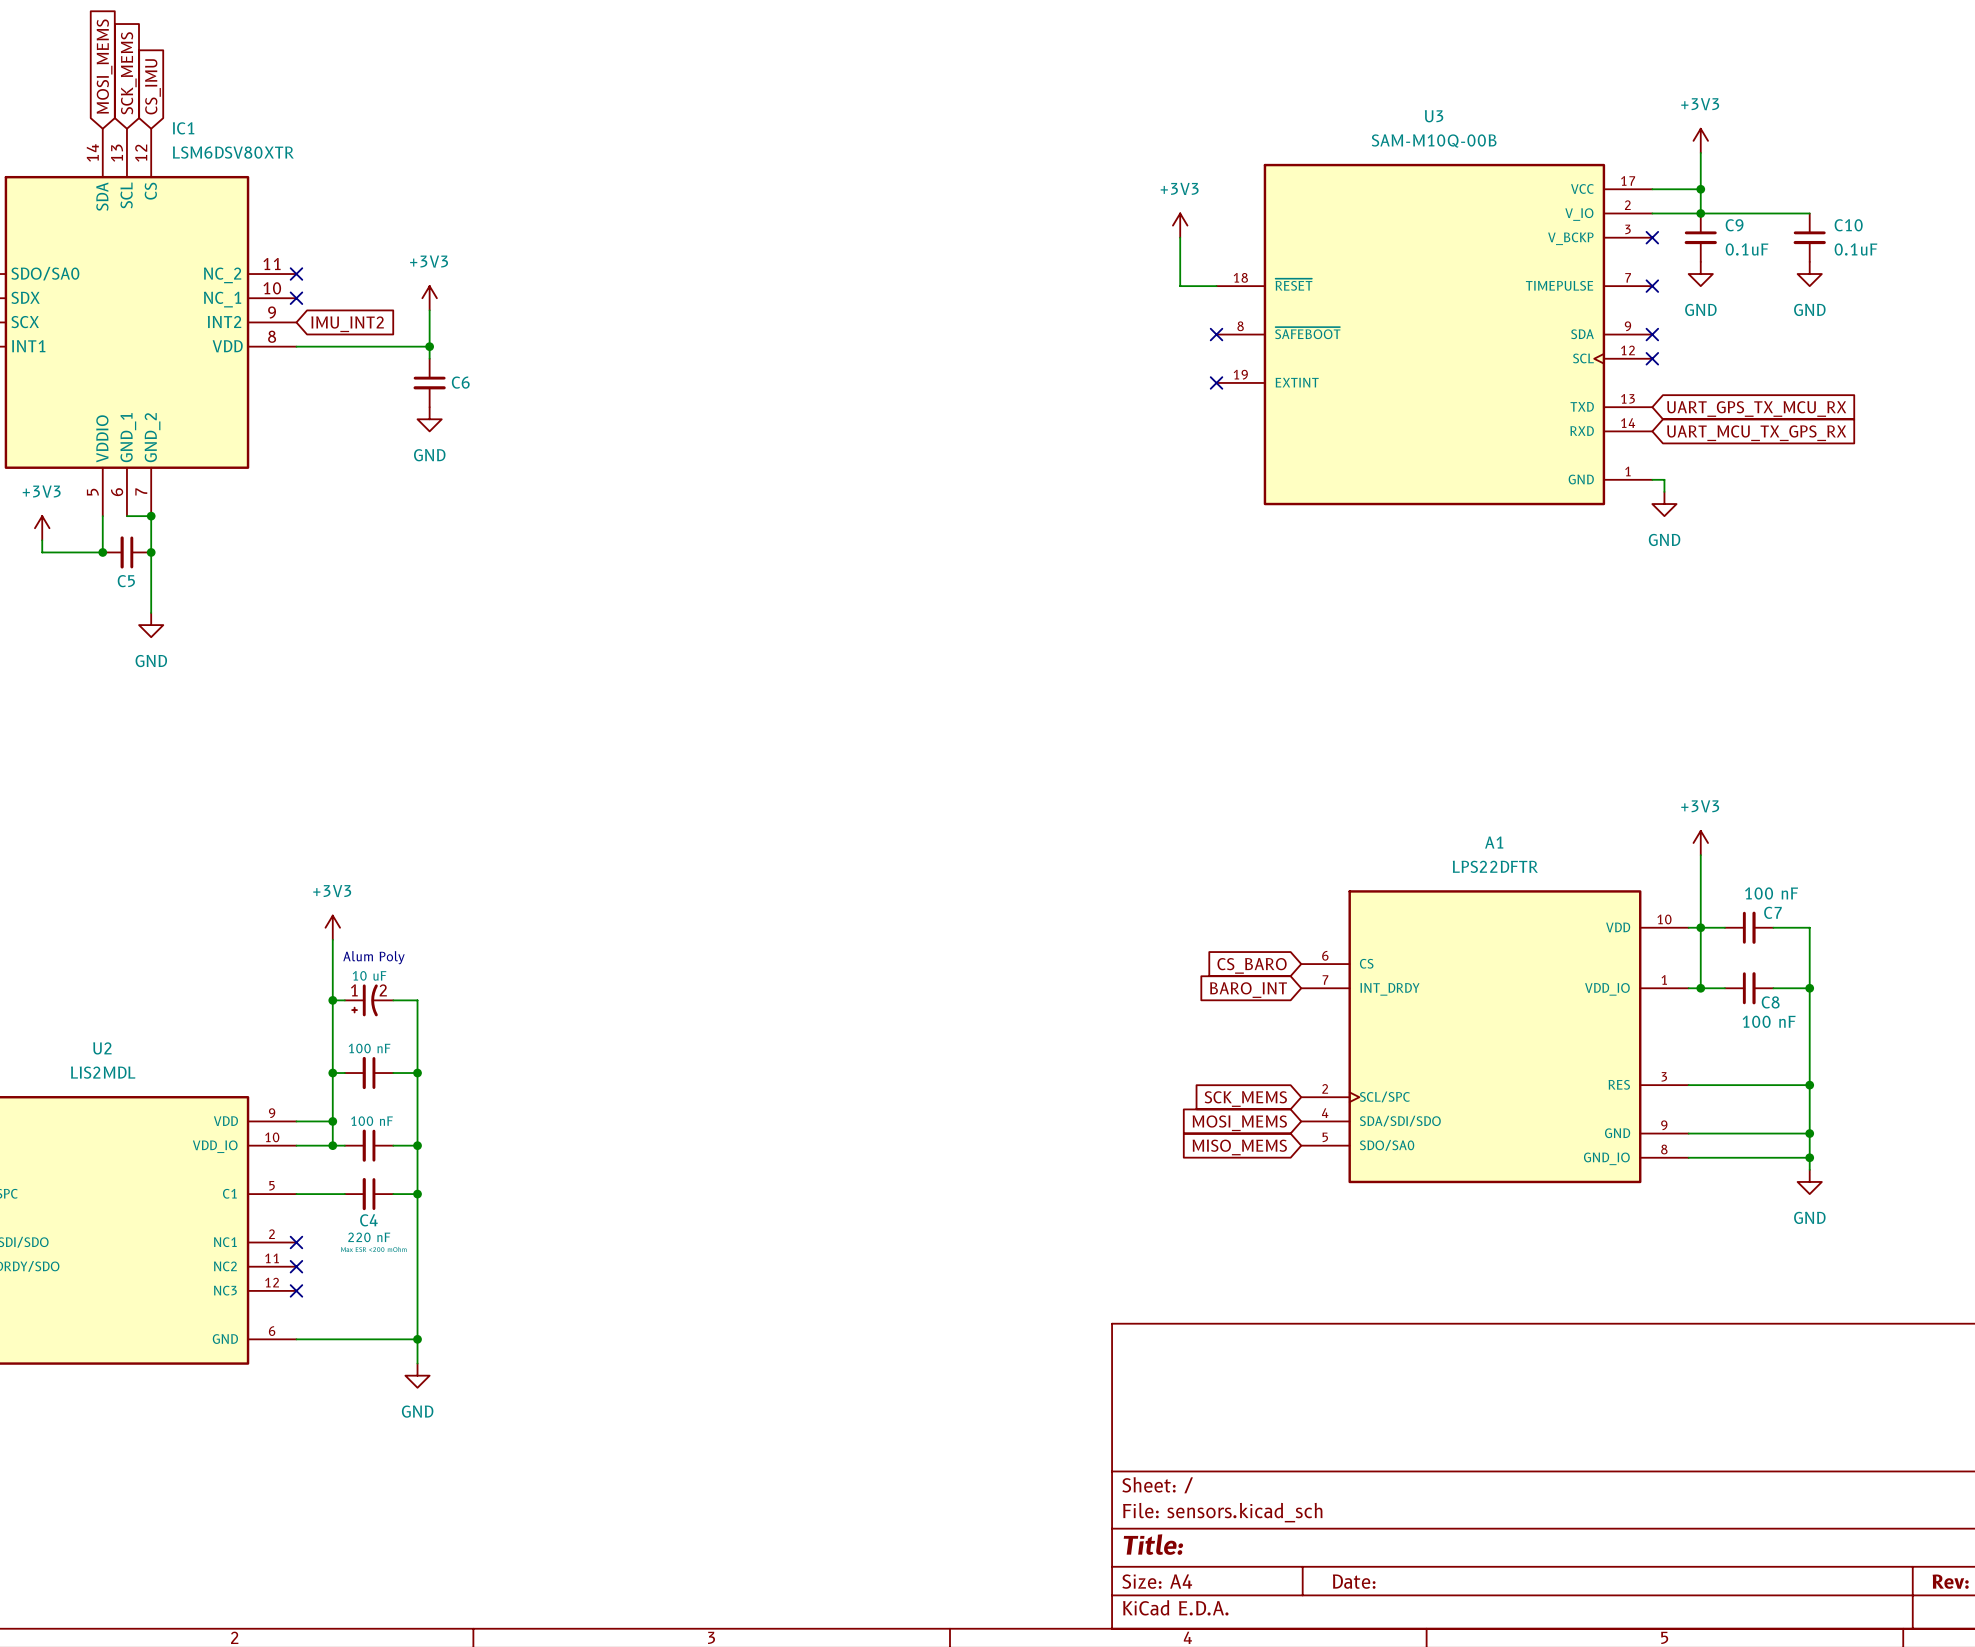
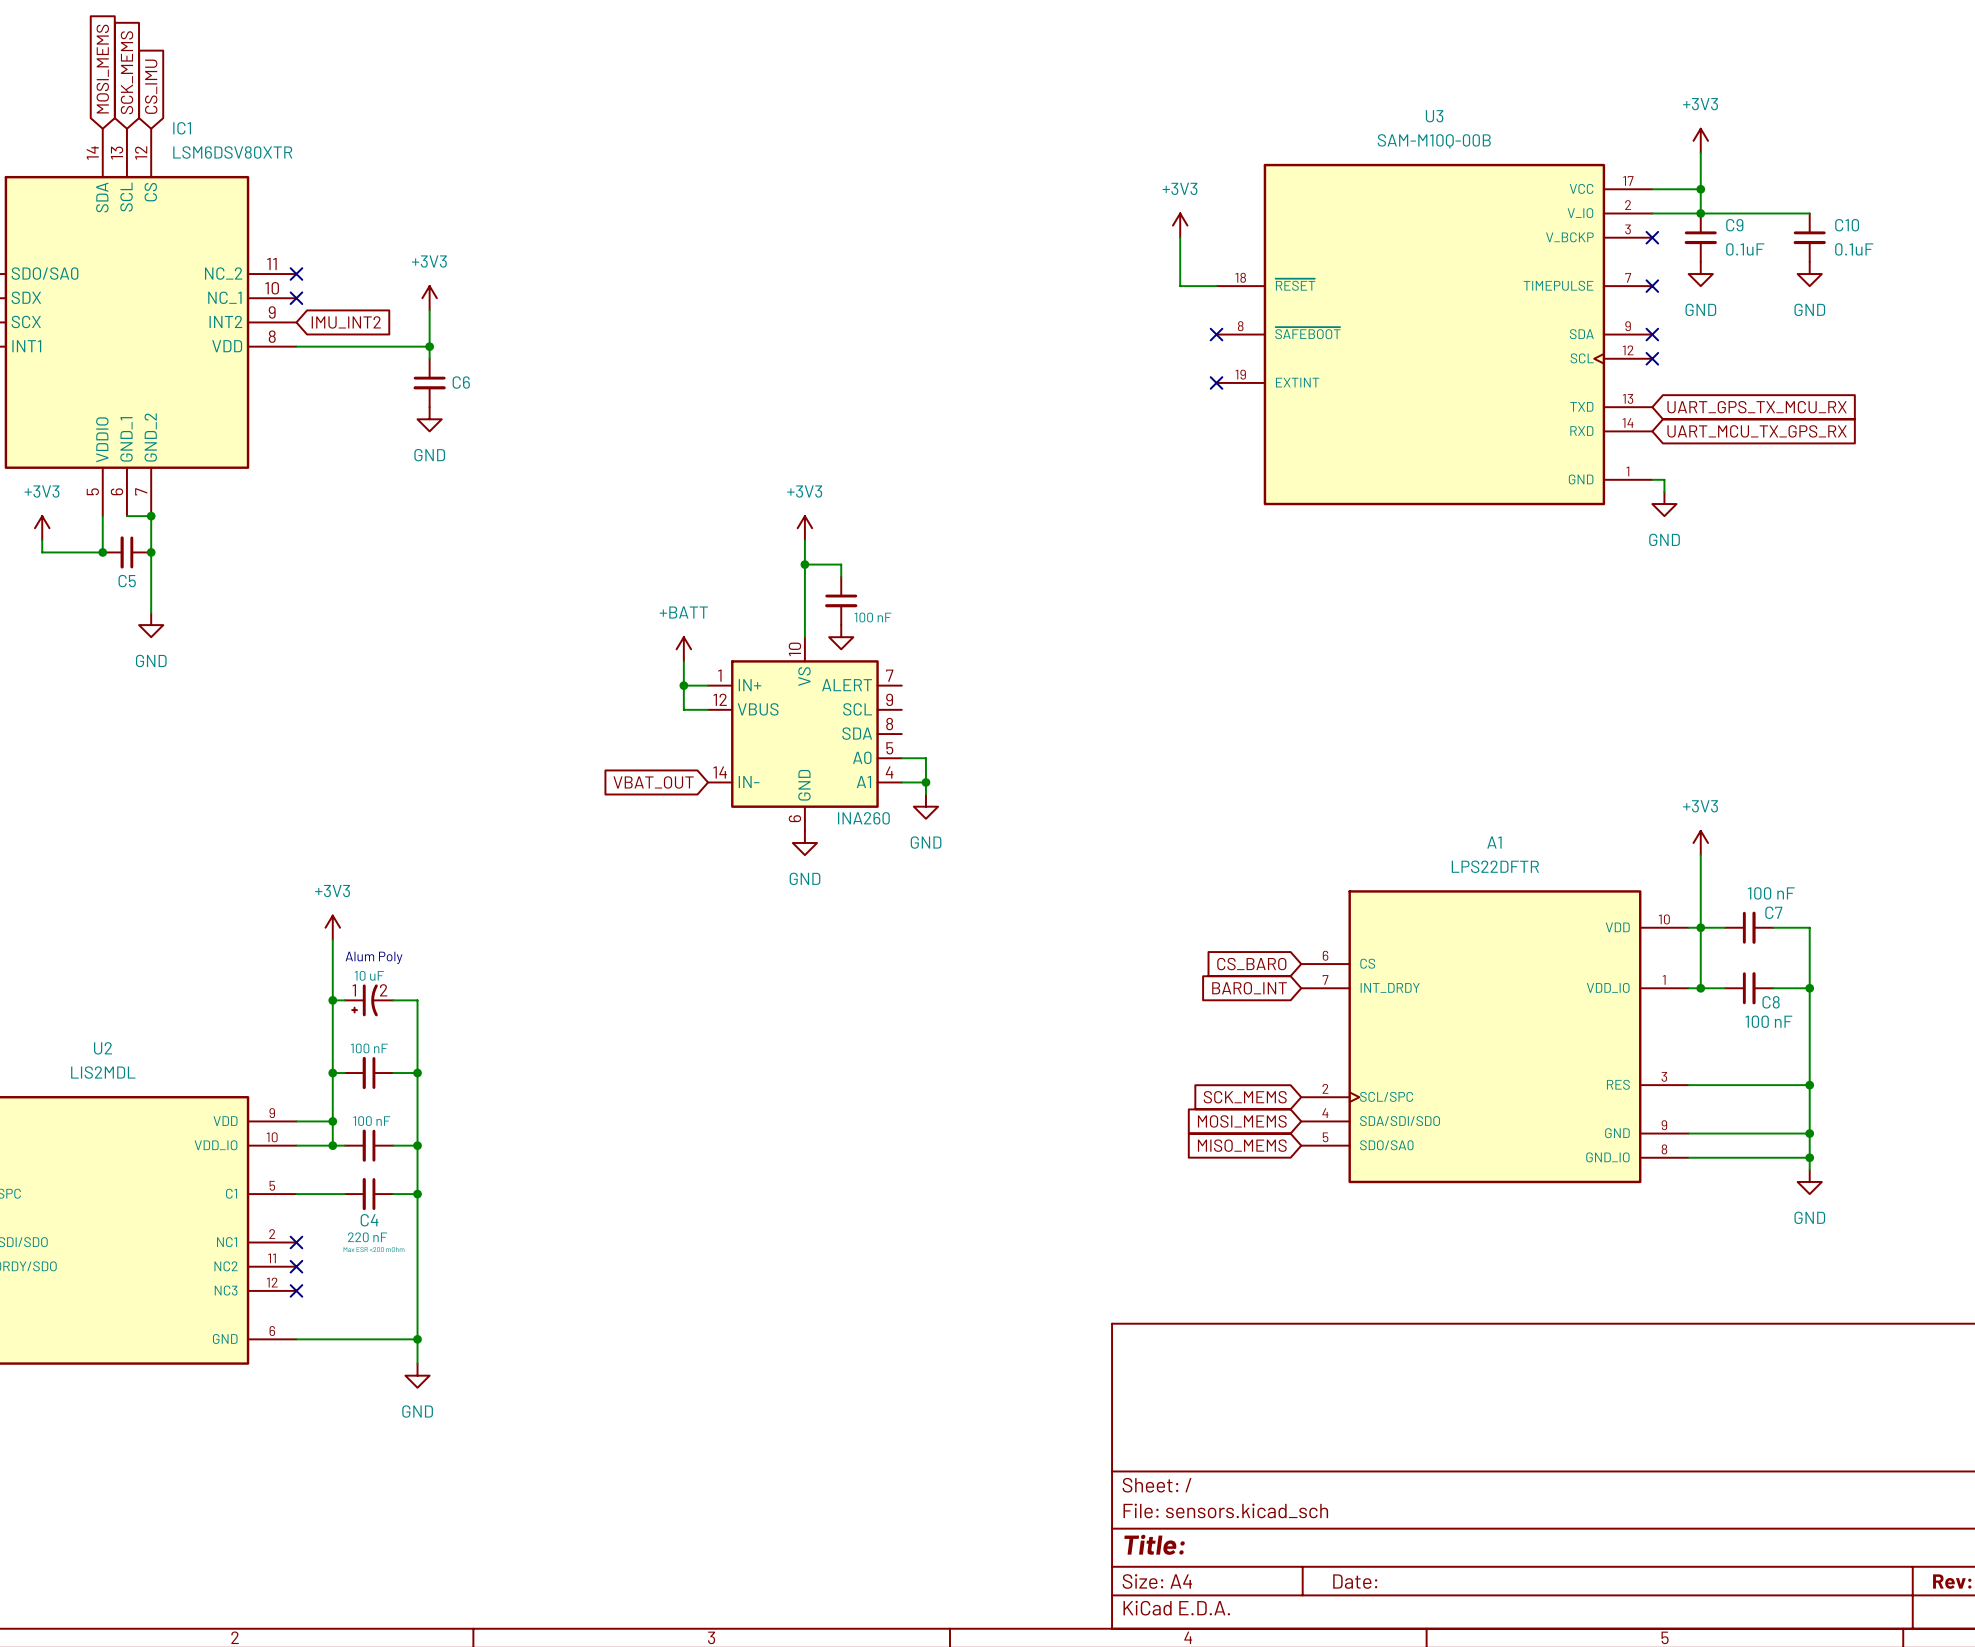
power symbol: none -> +3V3 (804, 528)
wire: none -> (804, 540) (804, 637)
wire: none -> (804, 564) (841, 564) (841, 576)
junction: none -> (804, 564)
part: none -> 100 nF (841, 600)
power symbol: none -> (841, 637)
power symbol: none -> +BATT (683, 649)
wire: none -> (683, 661) (683, 709) (708, 709)
wire: none -> (683, 685) (708, 685)
junction: none -> (683, 685)
part: none -> INA260 (804, 734)
wire: none -> (901, 758) (925, 758) (925, 794)
wire: none -> (901, 782) (925, 782)
junction: none -> (925, 782)
global label: none -> VBAT_OUT (653, 782)
power symbol: none -> GND (925, 806)
power symbol: none -> GND (804, 843)

